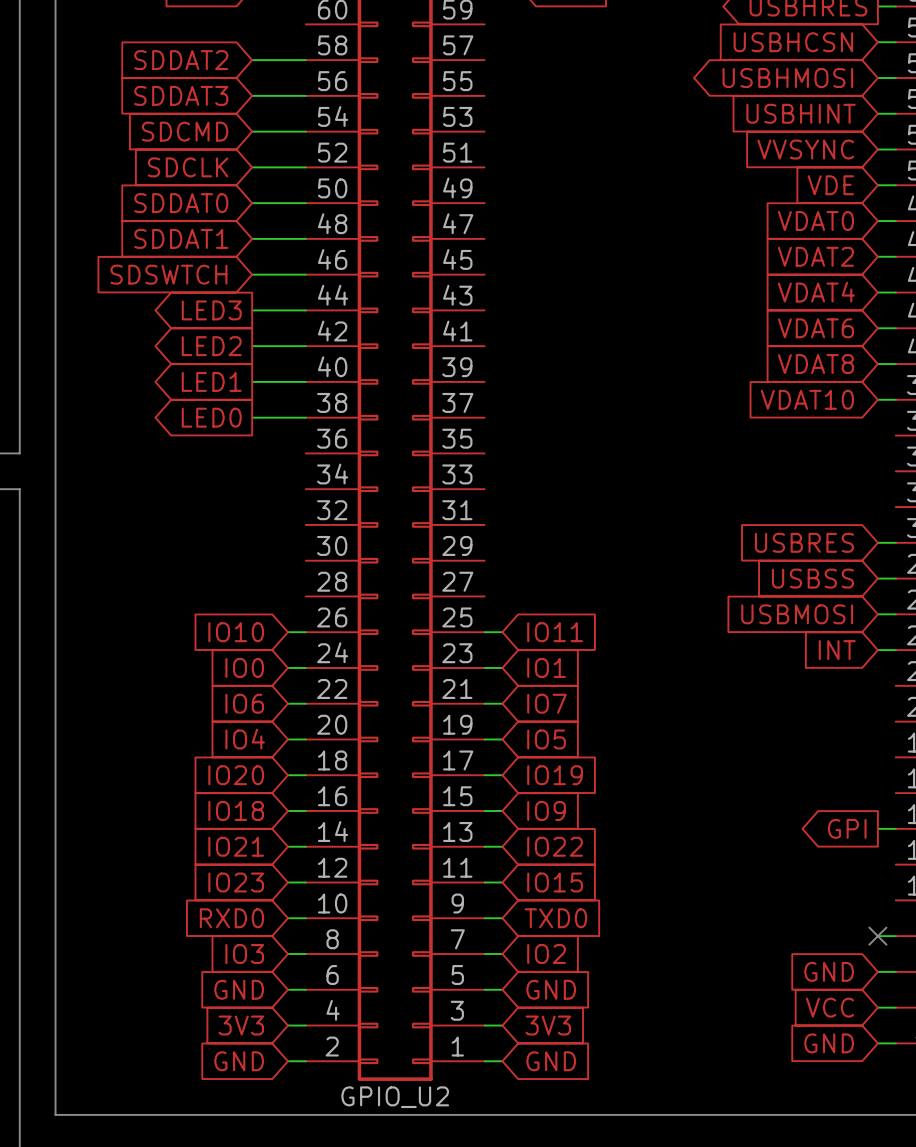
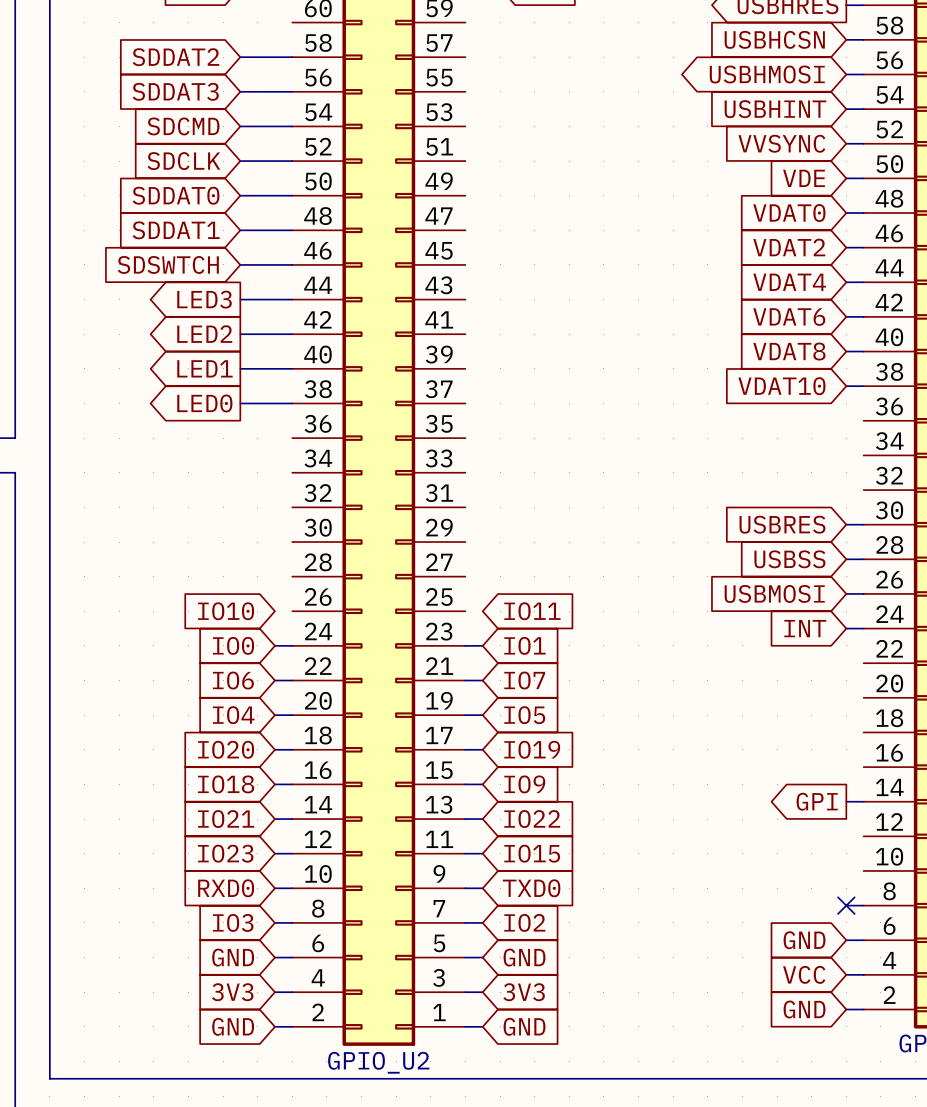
wire: (287, 632) (305, 632) -> none
wire: (484, 632) (502, 632) -> none

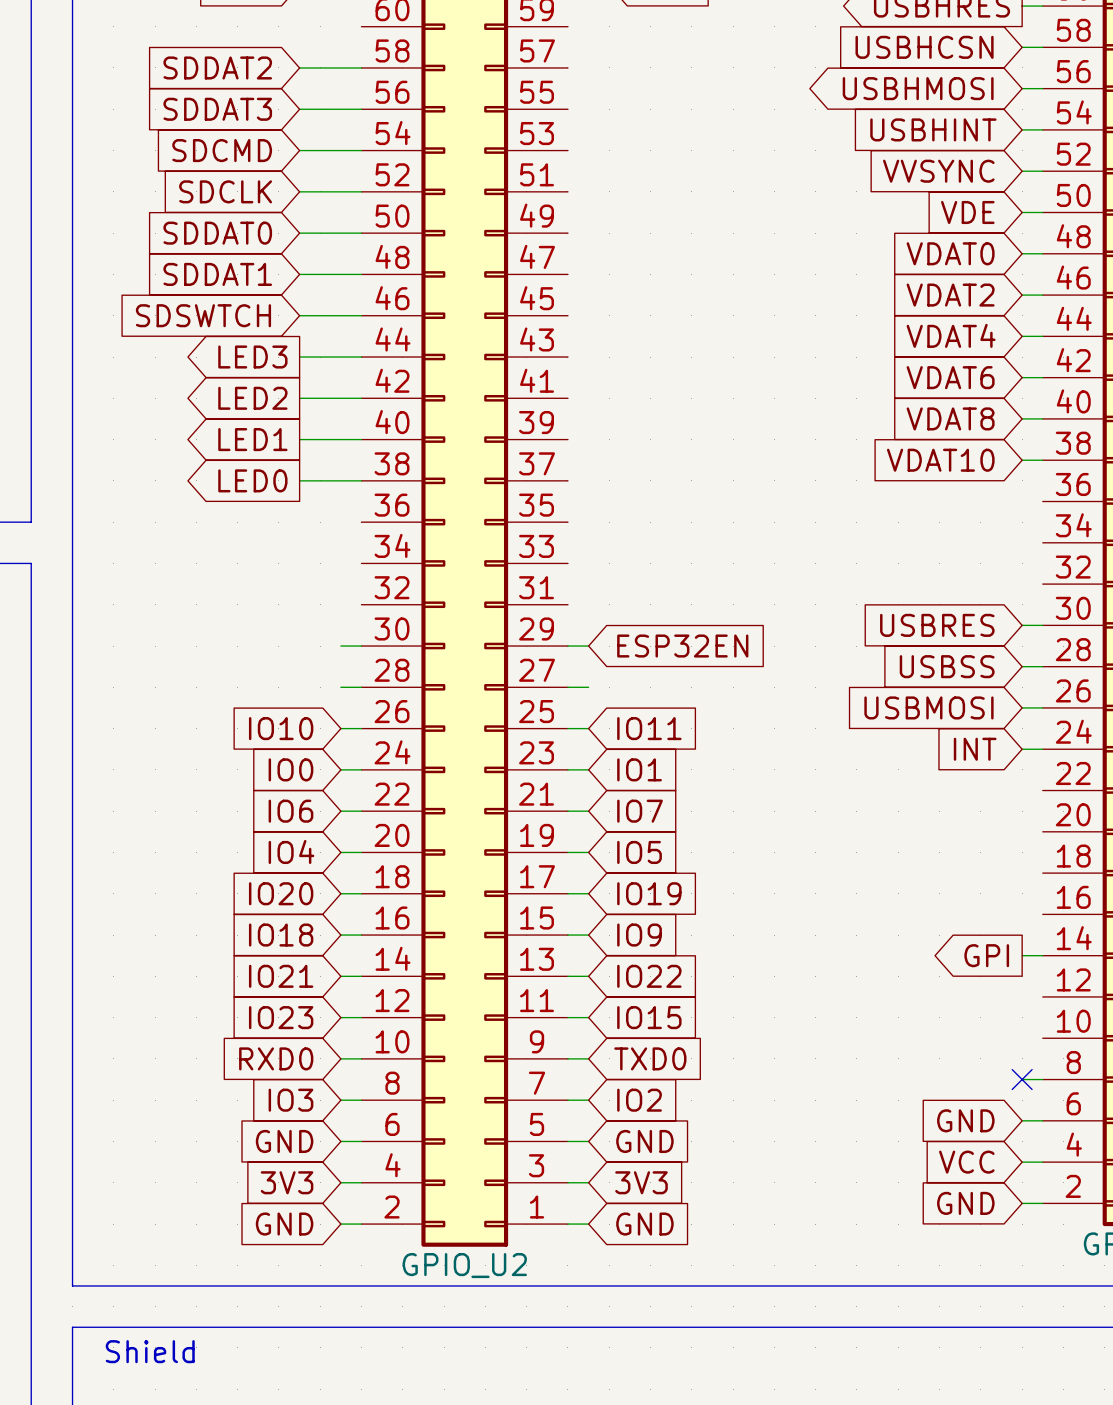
wire: none -> (340, 646) (361, 646)
wire: none -> (567, 646) (588, 646)
global label: none -> ESP32EN (682, 646)
wire: none -> (340, 687) (361, 687)
wire: none -> (567, 687) (588, 687)
wire: none -> (340, 728) (361, 728)
wire: none -> (567, 728) (588, 728)

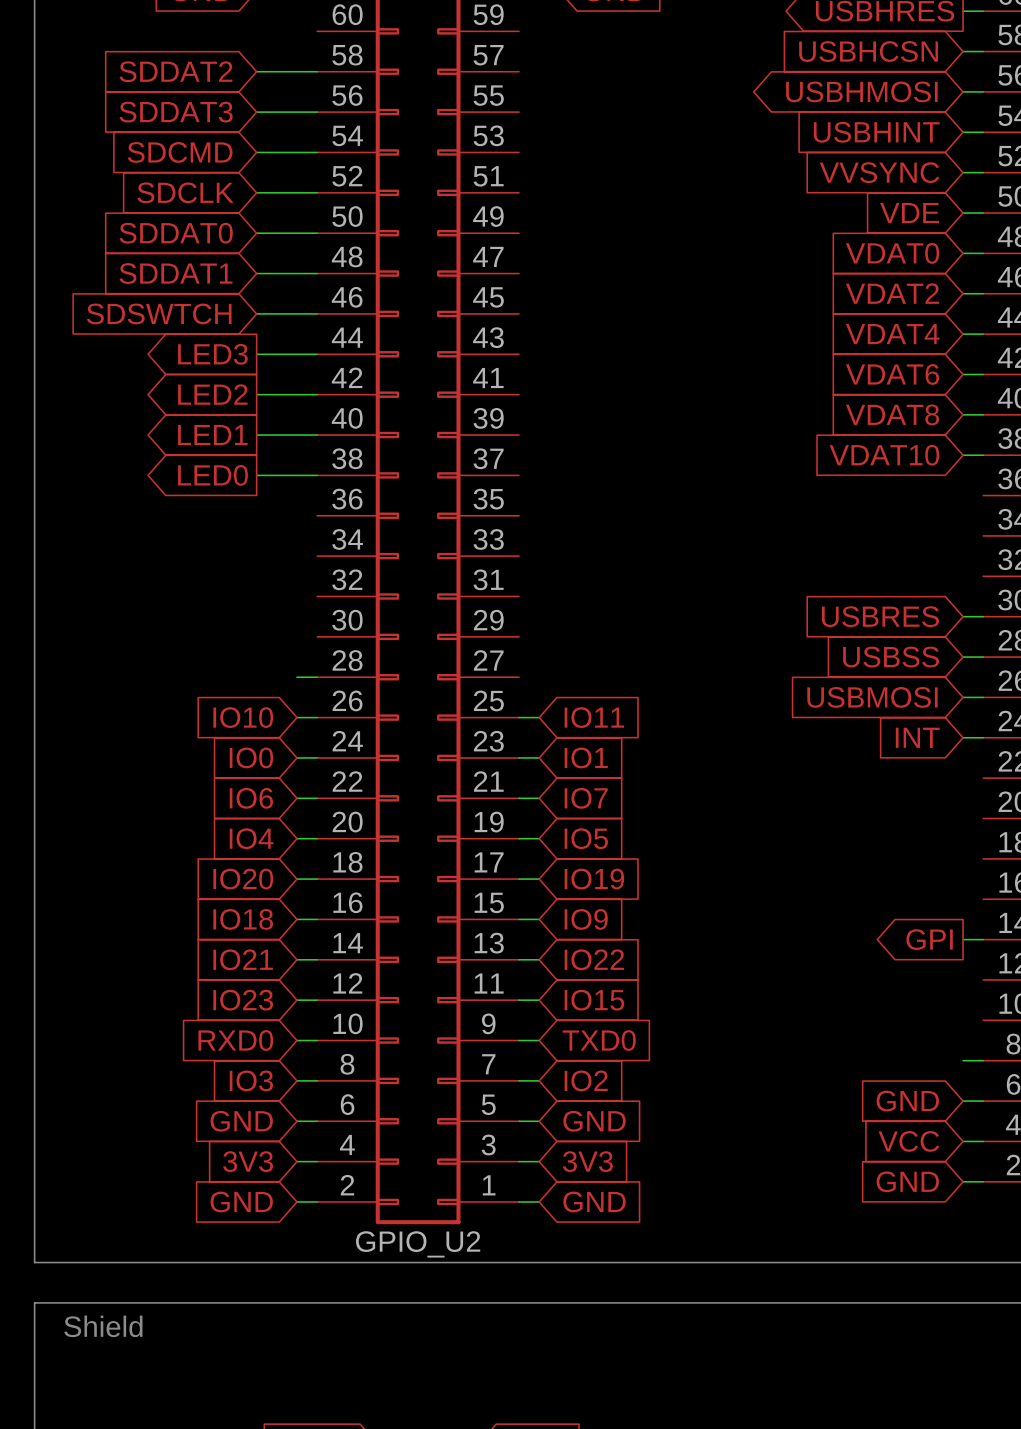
wire: (340, 646) (361, 646) -> none
wire: (567, 646) (588, 646) -> none
global label: ESP32EN (682, 646) -> none
wire: (567, 687) (588, 687) -> none
no-connect mark: (1022, 1079) -> none

